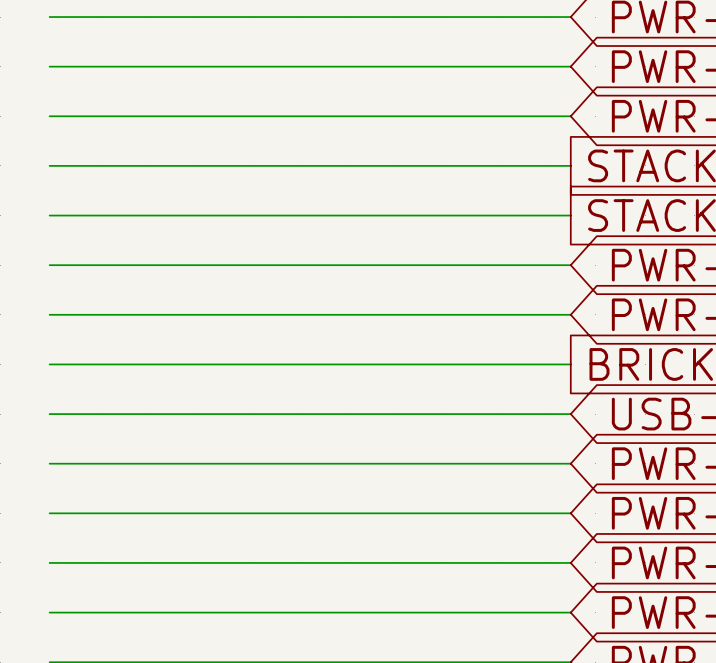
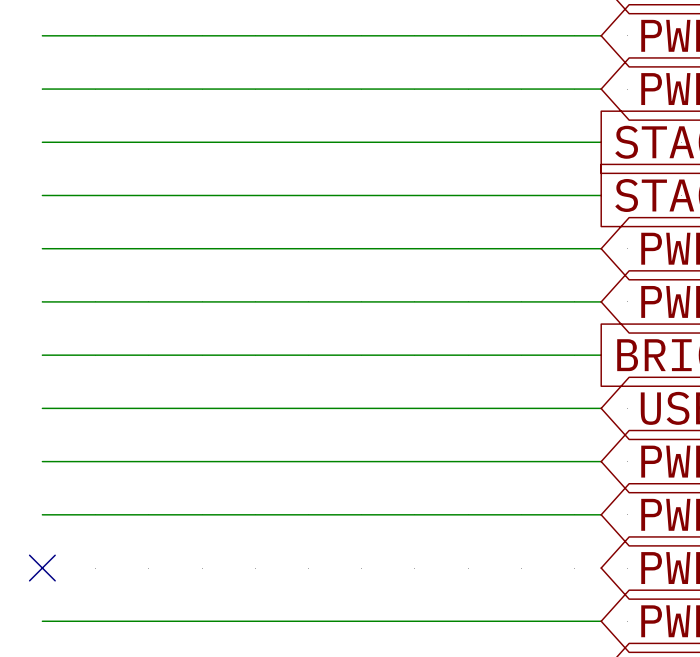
wire: (49, 562) (570, 562) -> none
no-connect mark: none -> (42, 568)

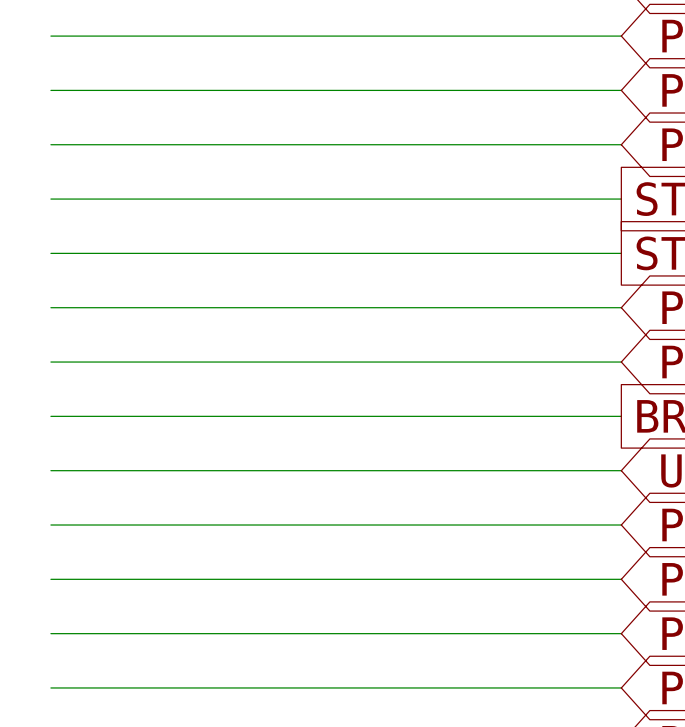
wire: none -> (50, 633) (621, 633)
no-connect mark: (42, 568) -> none

